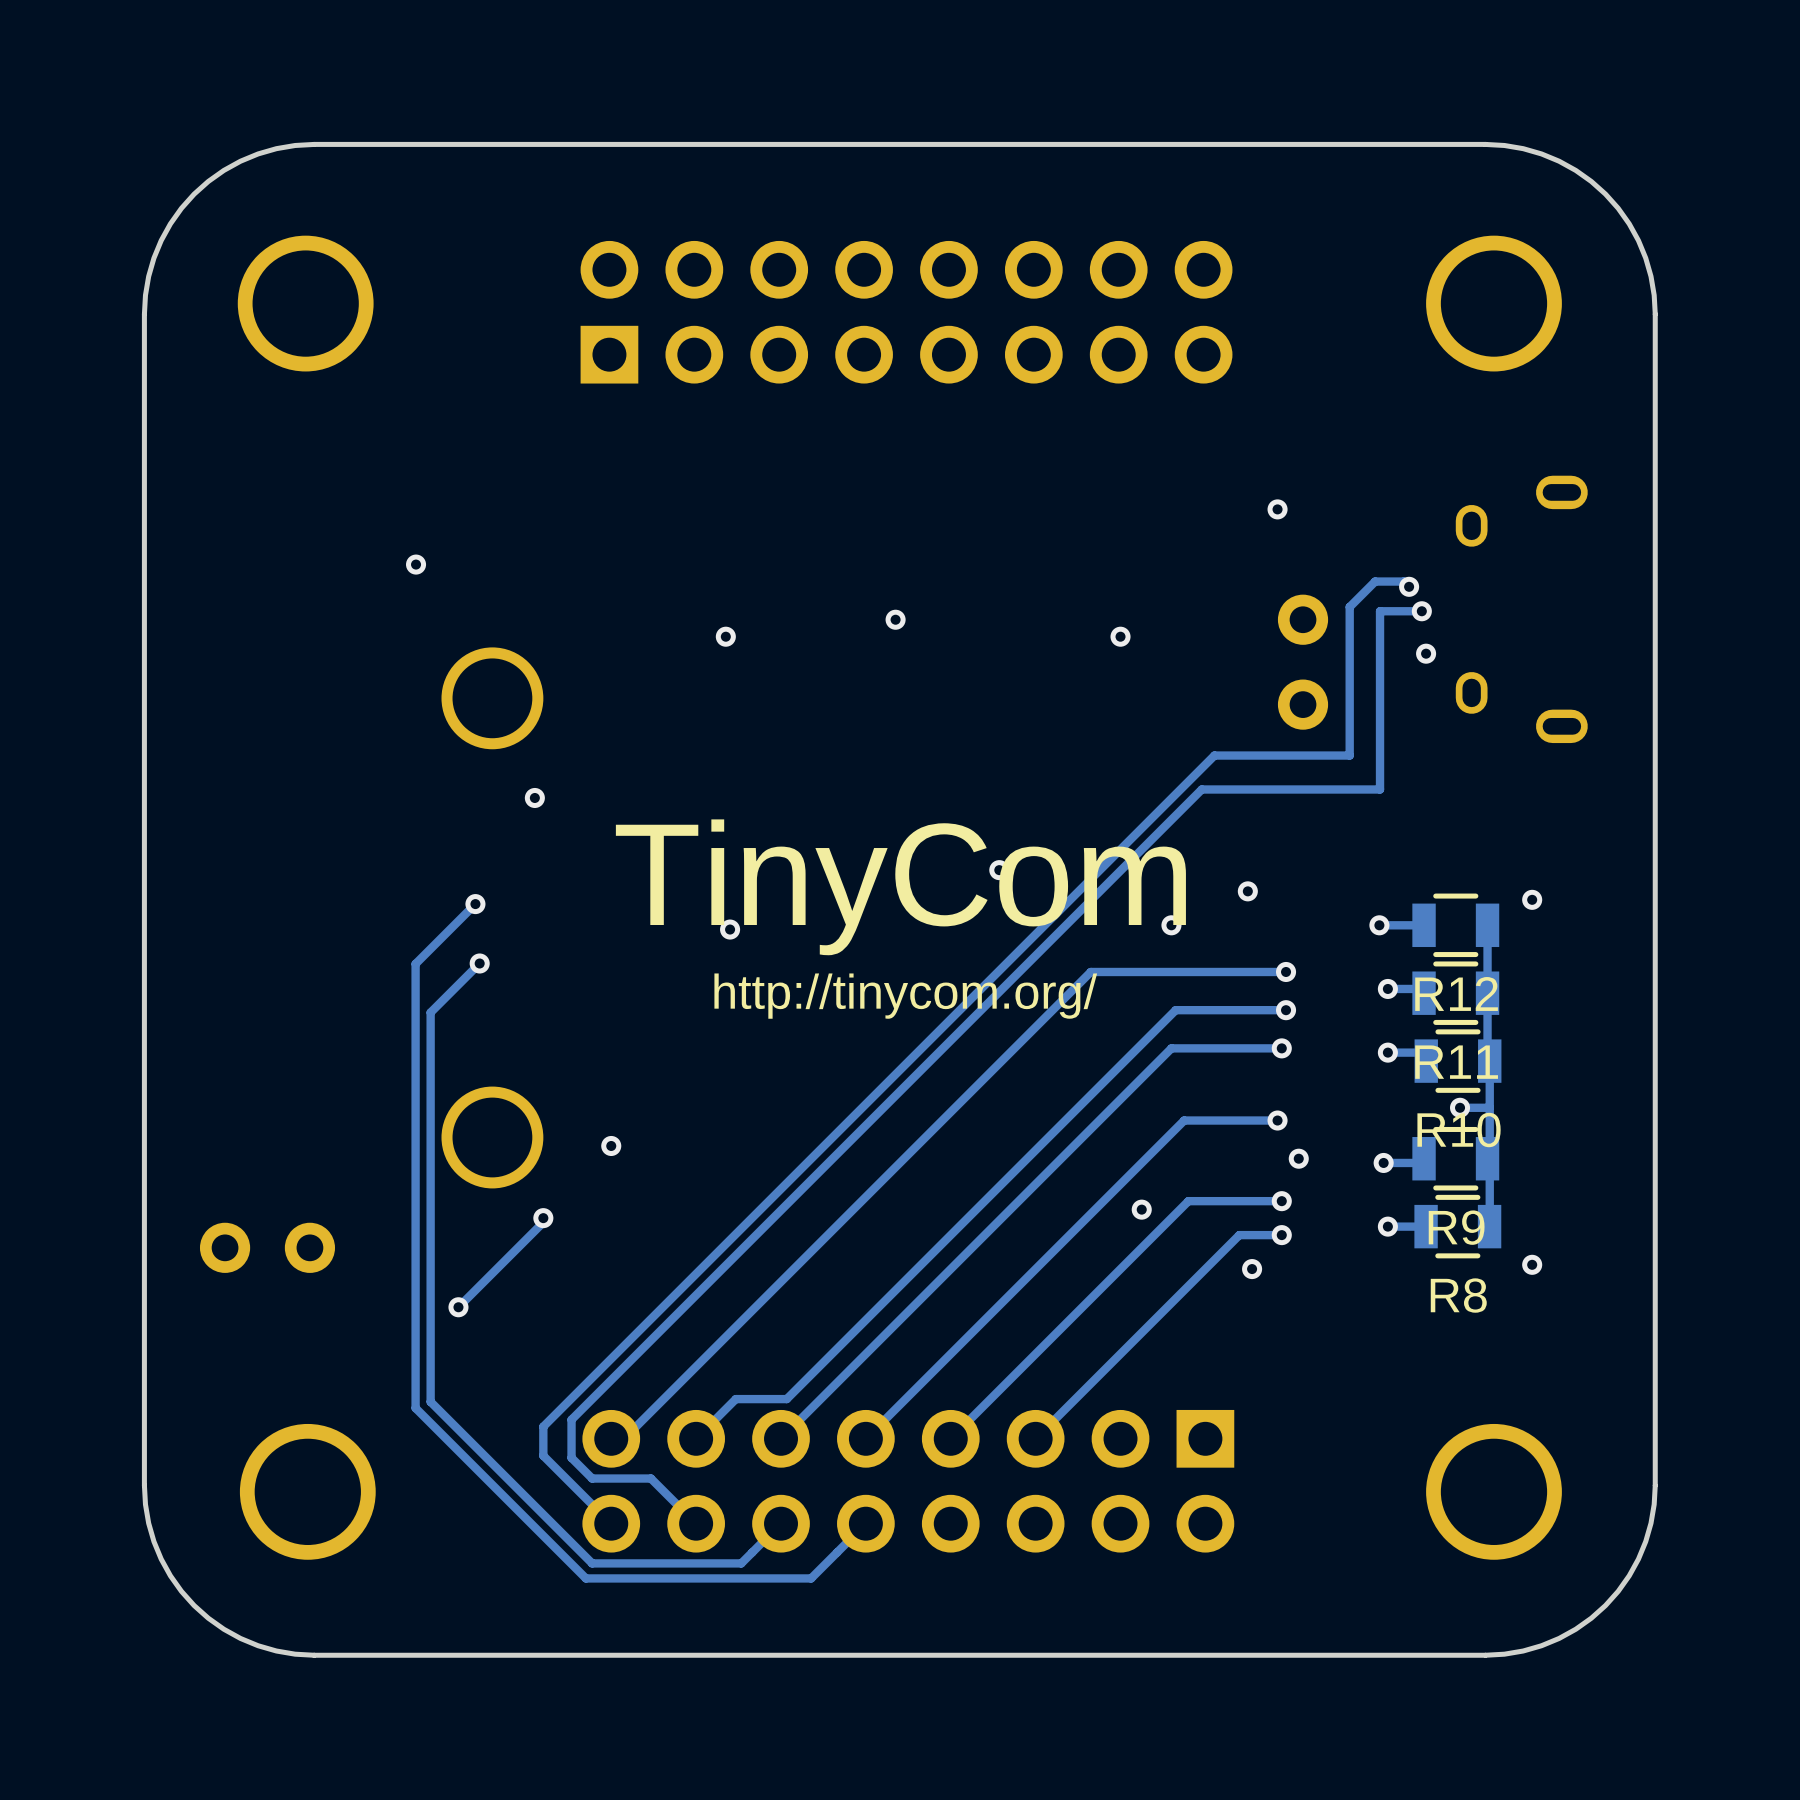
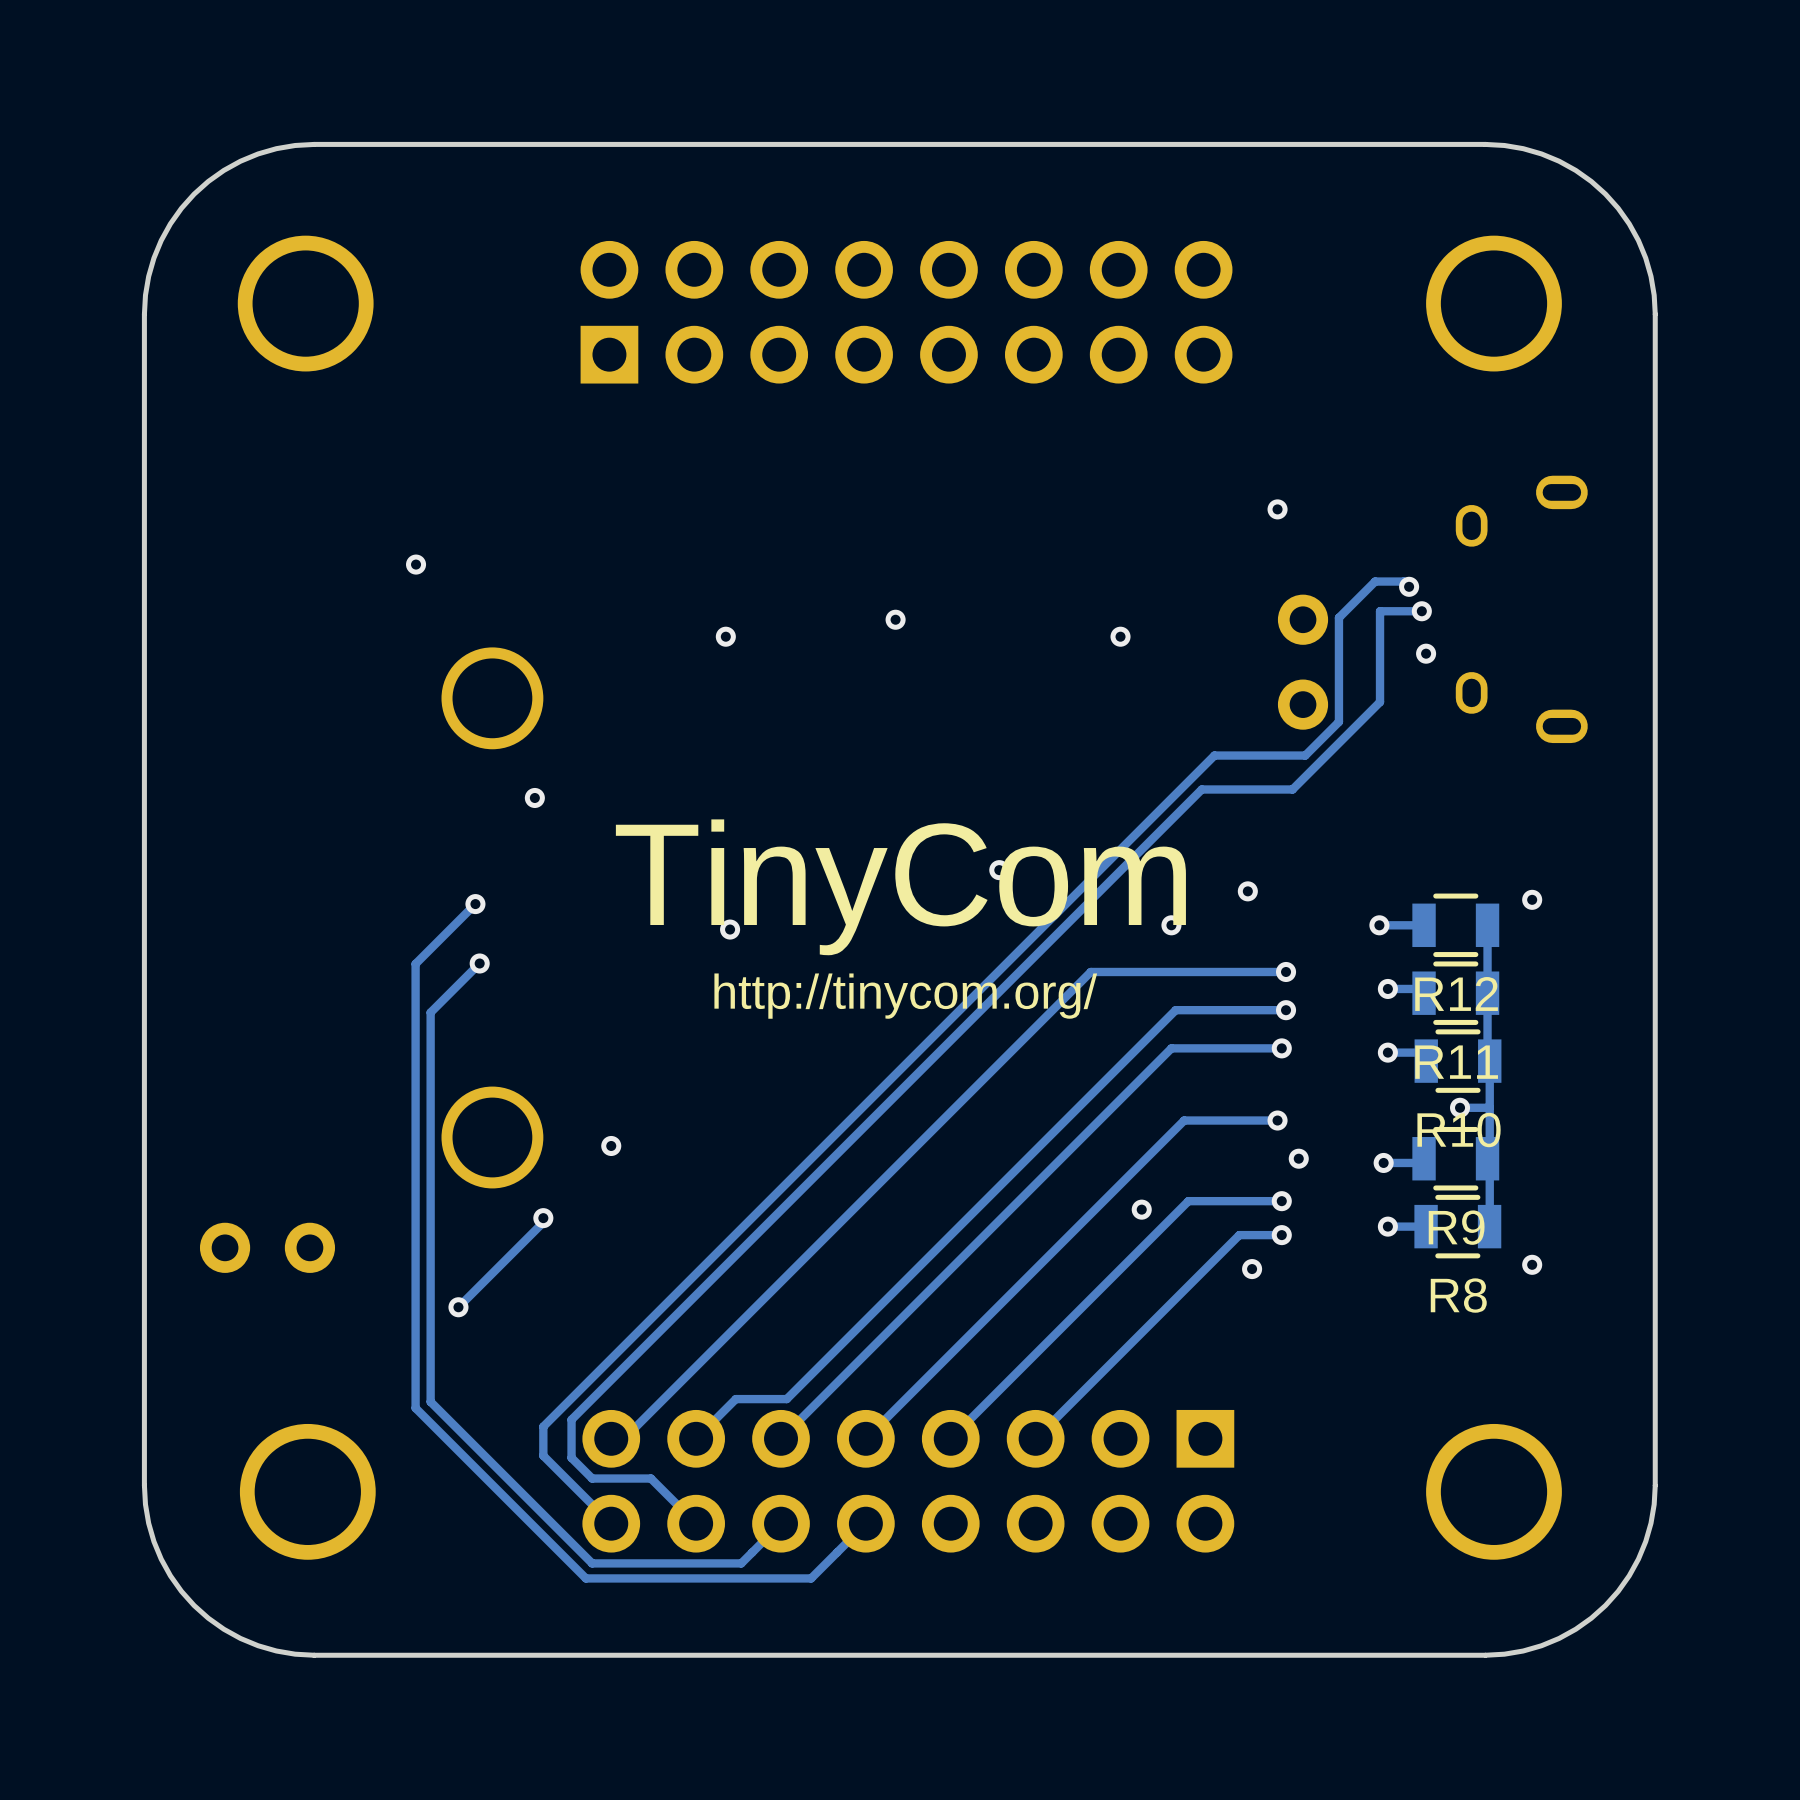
track: (1349, 607) (1349, 755) (1305, 755) -> (1349, 607) (1338, 617) (1338, 721) (1305, 755)
track: (1380, 702) (1380, 789) (1292, 789) -> (1380, 702) (1292, 789)

